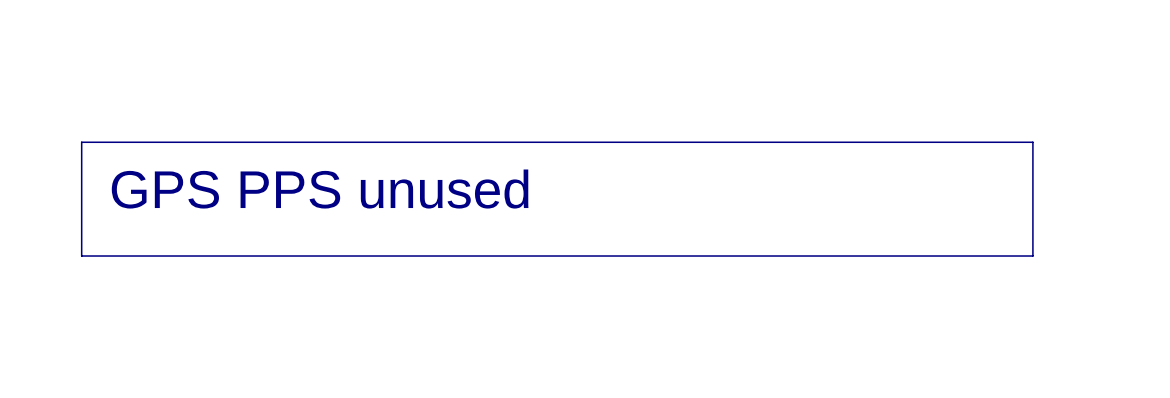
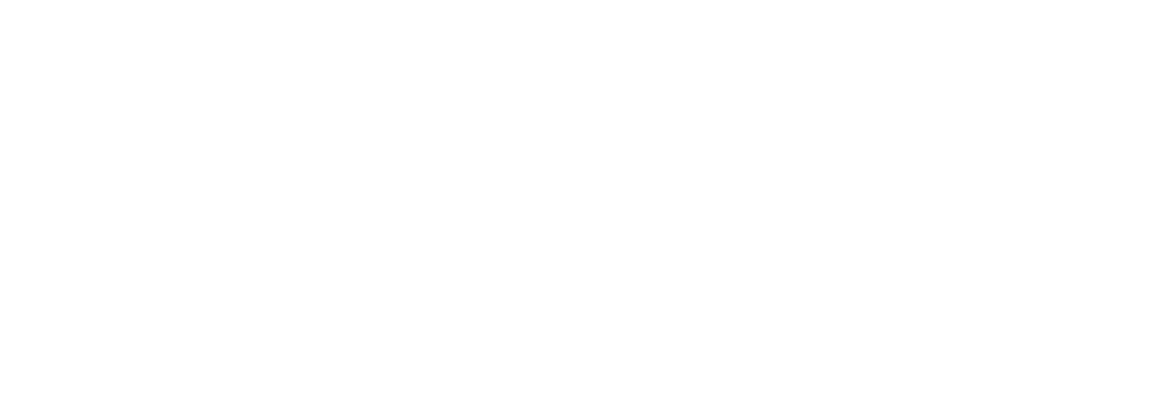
line: (81, 142) (1032, 142) (1032, 256) (81, 256) (81, 142) -> none
text: GPS PPS unused (320, 189) -> none

